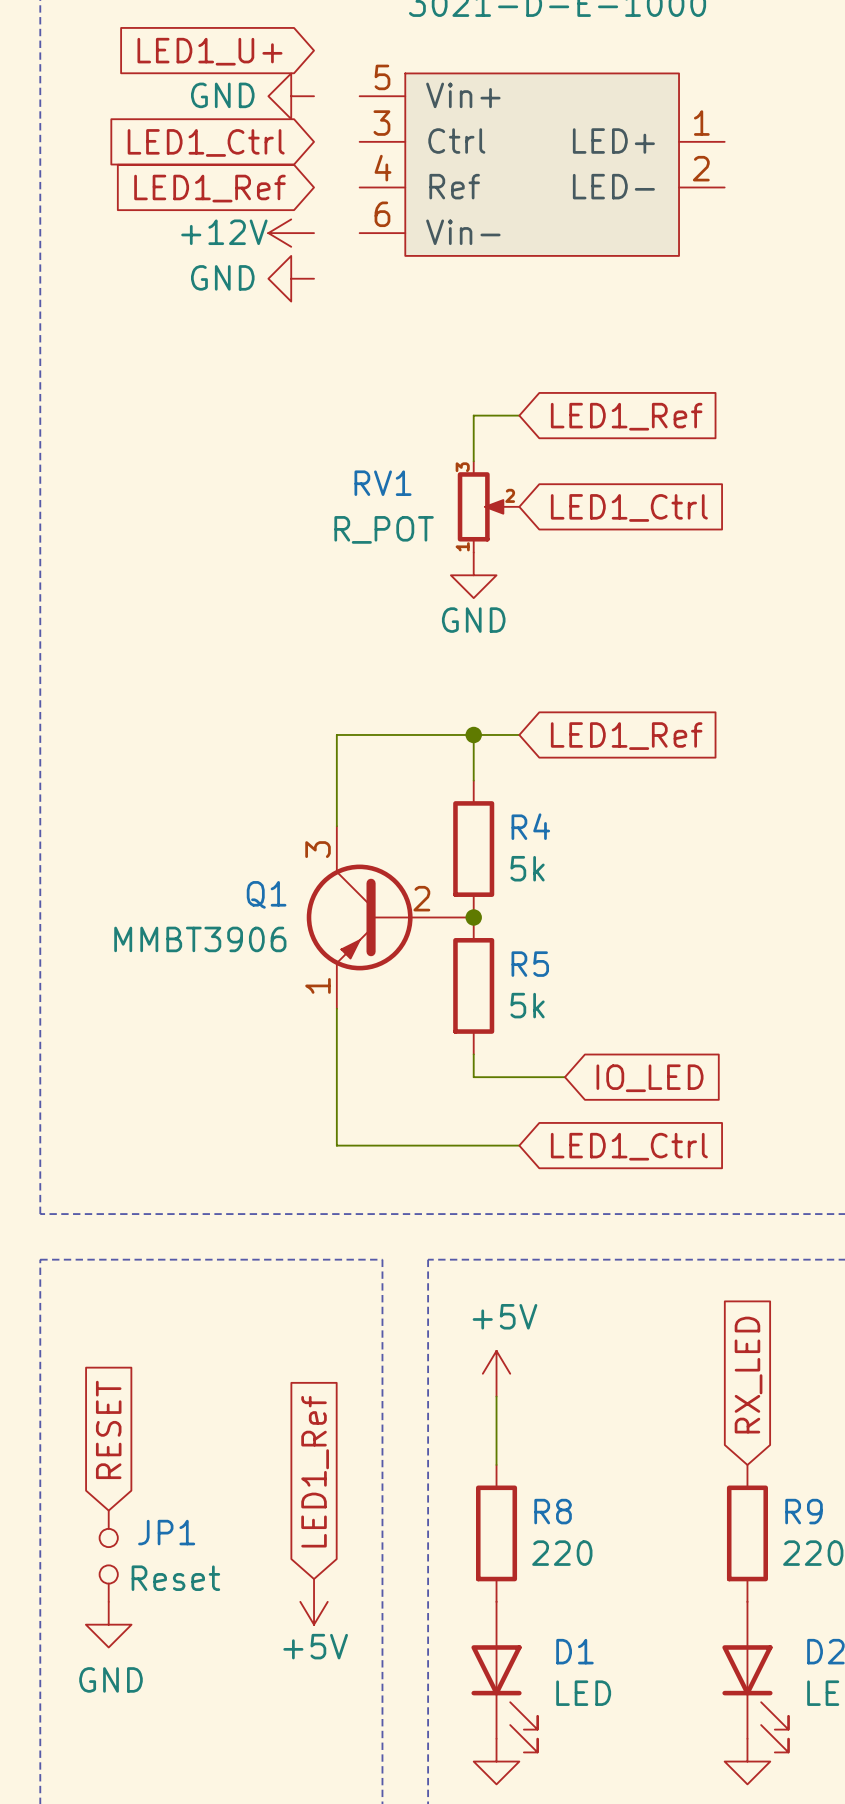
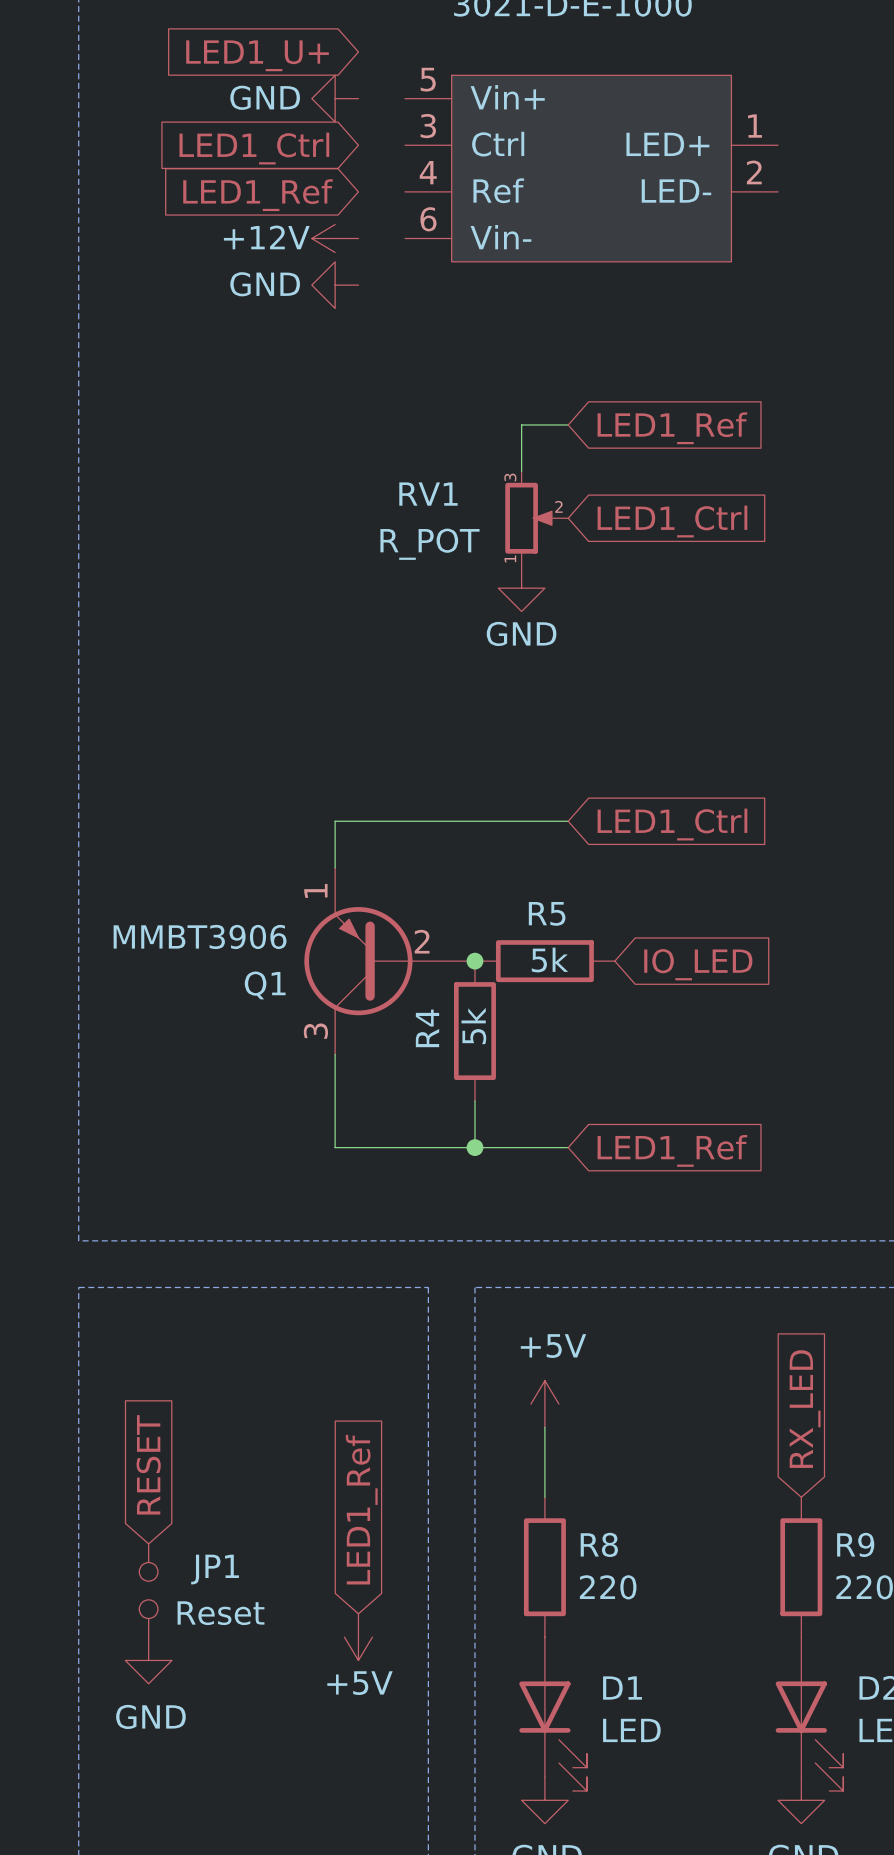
wire: (473, 734) (473, 780) -> (474, 1101) (474, 1147)
junction: (473, 734) -> none
wire: (519, 734) (336, 734) (336, 826) -> none
global label position: LED1_Ref (626, 736) -> LED1_Ref (672, 1150)
wire: none -> (568, 821) (335, 821) (335, 867)
R4 name rotation: 0° (530, 826) -> 90° counterclockwise (427, 1028)
R4 name position: R4 (530, 826) -> R4 (427, 1028)
R4 position: (473, 849) -> (474, 1031)
R4 value rotation: 0° (527, 868) -> 90° counterclockwise (473, 1026)
R4 value position: 5k (527, 868) -> 5k (473, 1026)
Q1 flip: as is (359, 917) -> up-down (358, 961)
junction position: (473, 917) -> (474, 961)
R5 name position: R5 (530, 964) -> R5 (547, 913)
R5 rotation: 0° (473, 985) -> 90° clockwise (544, 961)
R5 value position: 5k (527, 1005) -> 5k (549, 960)
wire: (336, 1008) (336, 1145) (519, 1145) -> none
wire: none -> (335, 1054) (335, 1147) (568, 1147)
wire: (473, 1054) (473, 1077) (564, 1077) -> none
global label position: IO_LED (650, 1078) -> IO_LED (698, 964)
junction: none -> (474, 1147)
global label position: LED1_Ctrl (629, 1146) -> LED1_Ctrl (672, 824)

